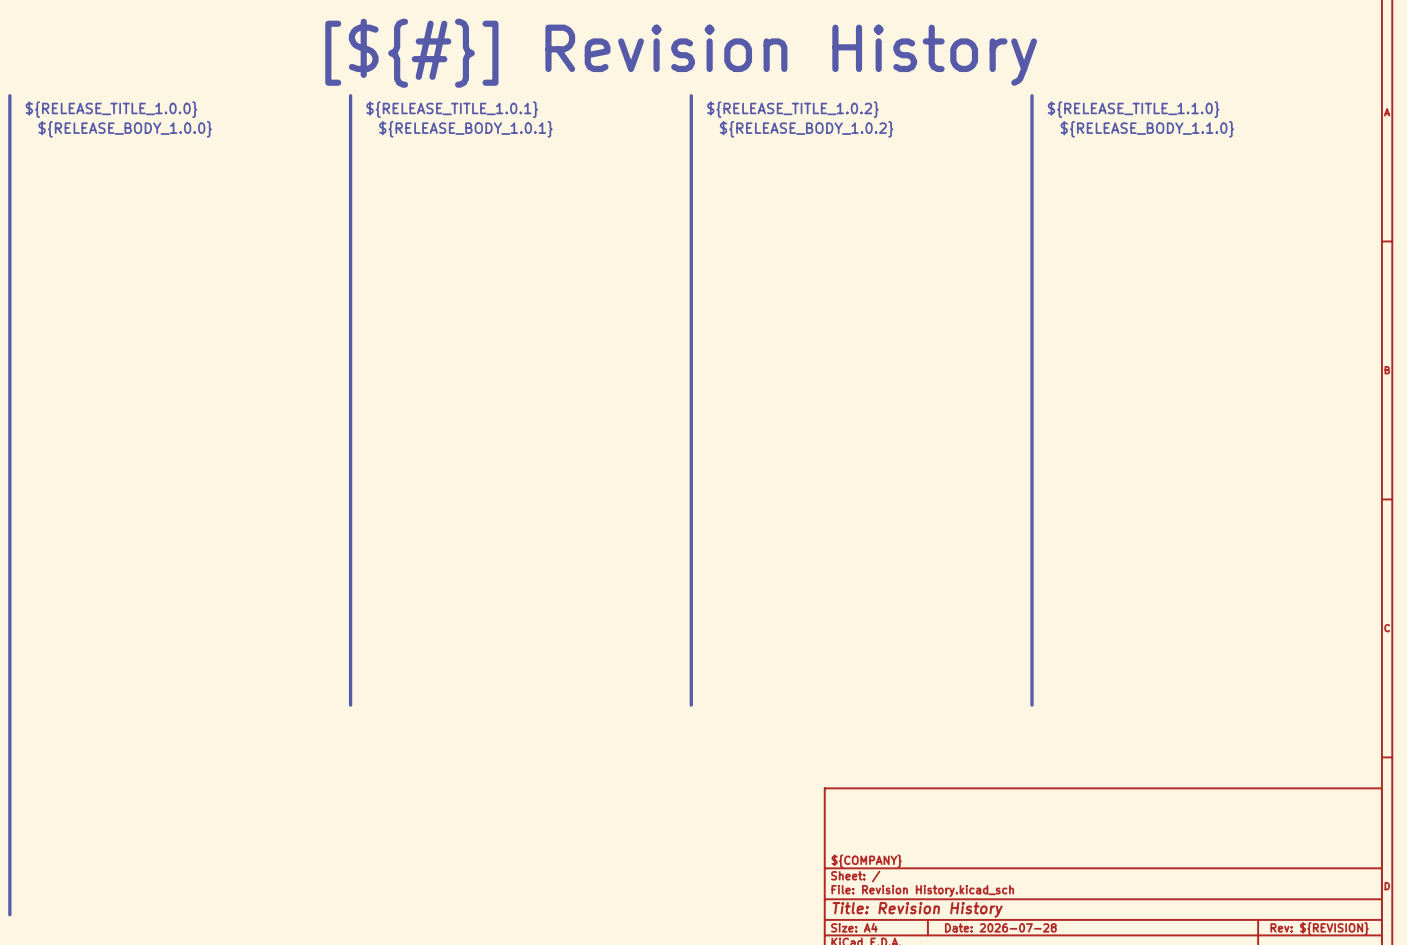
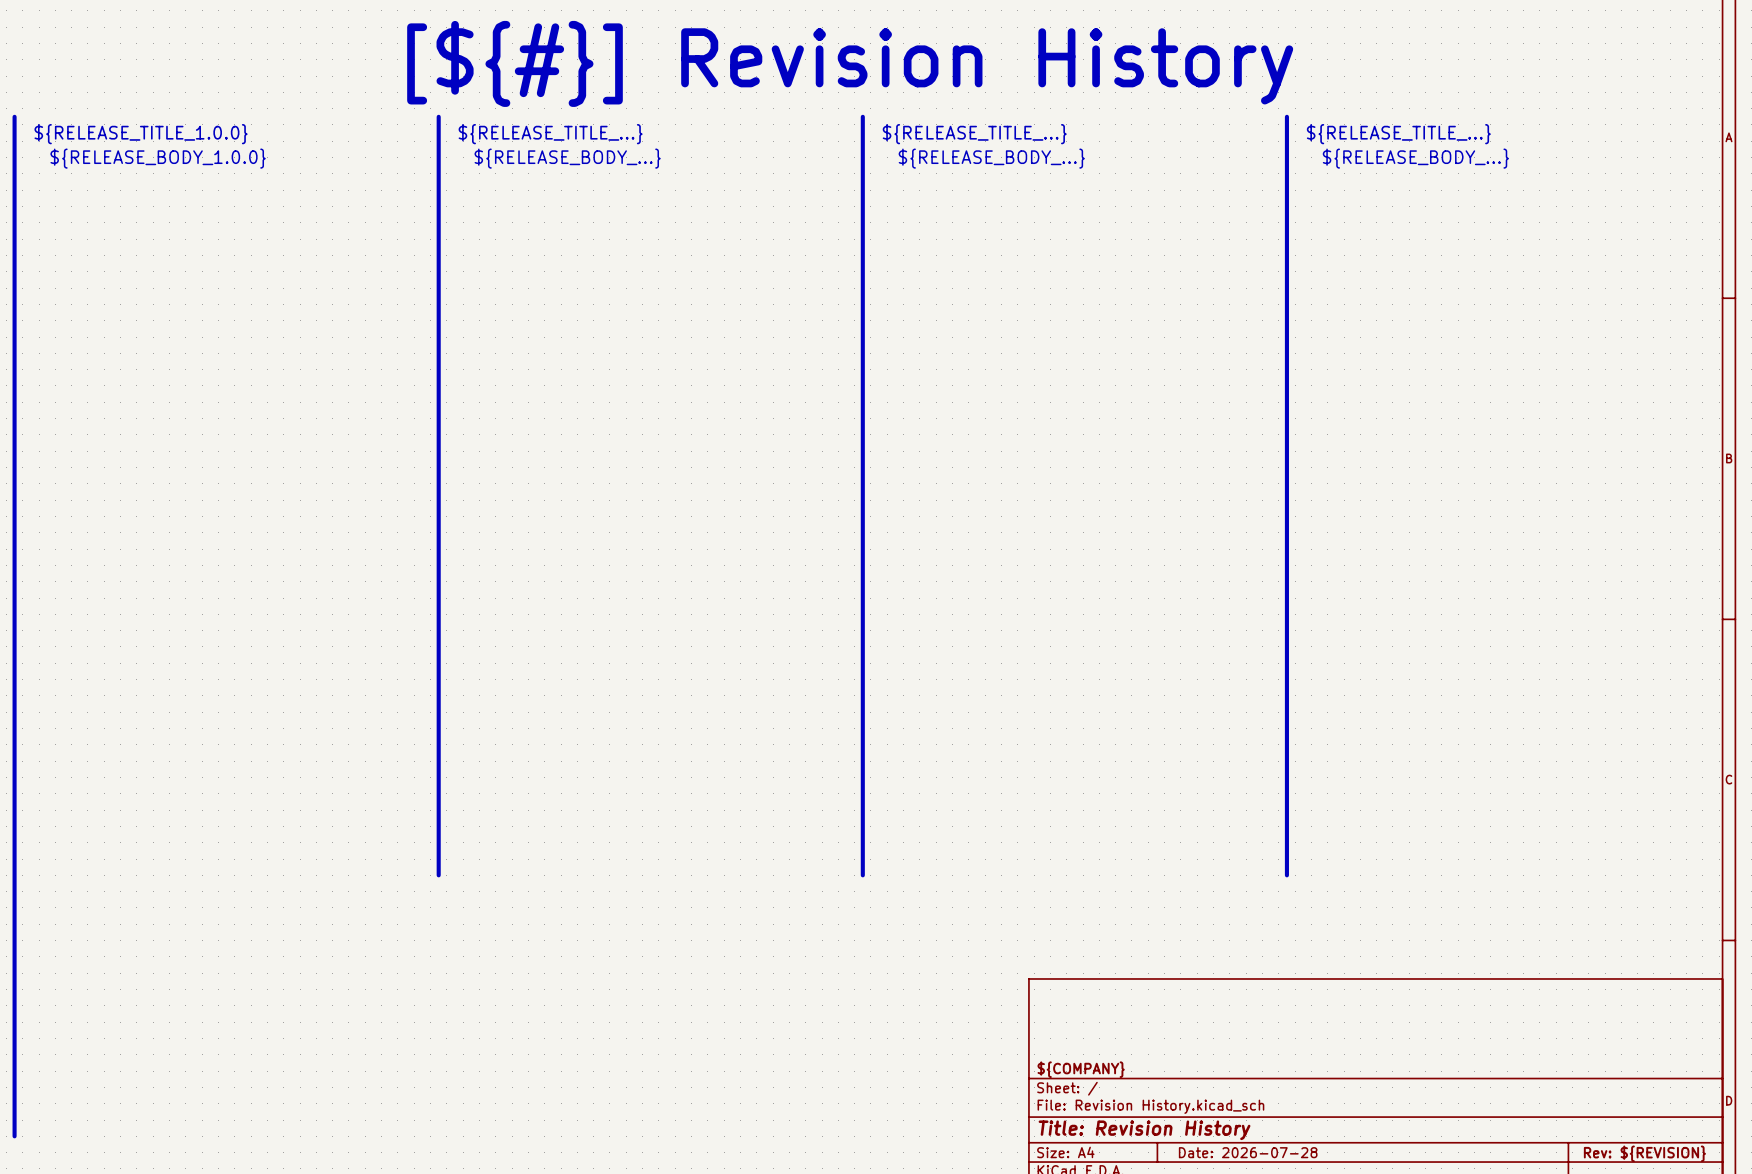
text: ${RELEASE_TITLE_1.0.1} (452, 109) -> ${RELEASE_TITLE_...} (550, 134)
text: ${RELEASE_TITLE_1.0.2} (792, 109) -> ${RELEASE_TITLE_...} (974, 134)
text: ${RELEASE_TITLE_1.1.0} (1133, 109) -> ${RELEASE_TITLE_...} (1398, 134)
text: ${RELEASE_BODY_1.0.1} (465, 129) -> ${RELEASE_BODY_...} (567, 158)
text: ${RELEASE_BODY_1.0.2} (806, 129) -> ${RELEASE_BODY_...} (991, 158)
text: ${RELEASE_BODY_1.1.0} (1147, 129) -> ${RELEASE_BODY_...} (1415, 158)

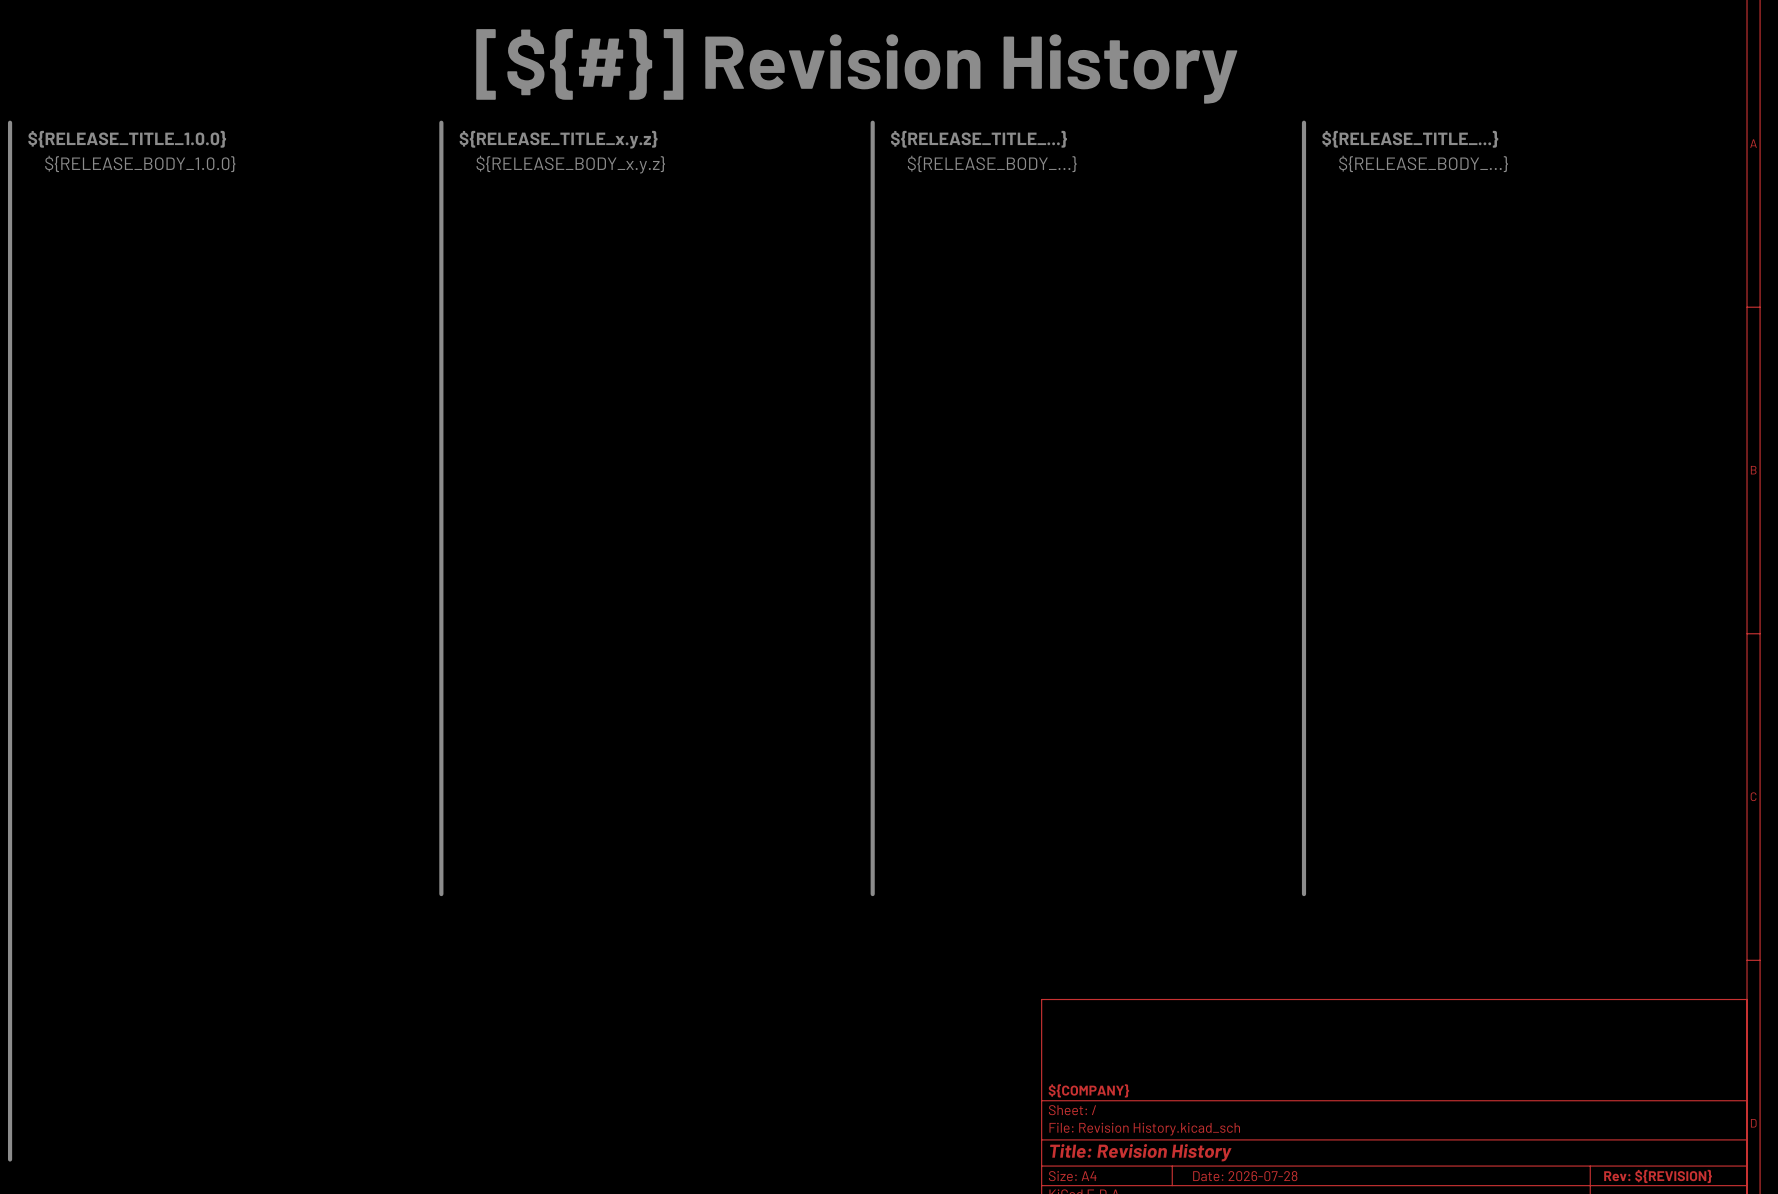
text: ${RELEASE_TITLE_...} (550, 134) -> ${RELEASE_TITLE_x.y.z} (558, 139)
text: ${RELEASE_BODY_...} (567, 158) -> ${RELEASE_BODY_x.y.z} (570, 164)

